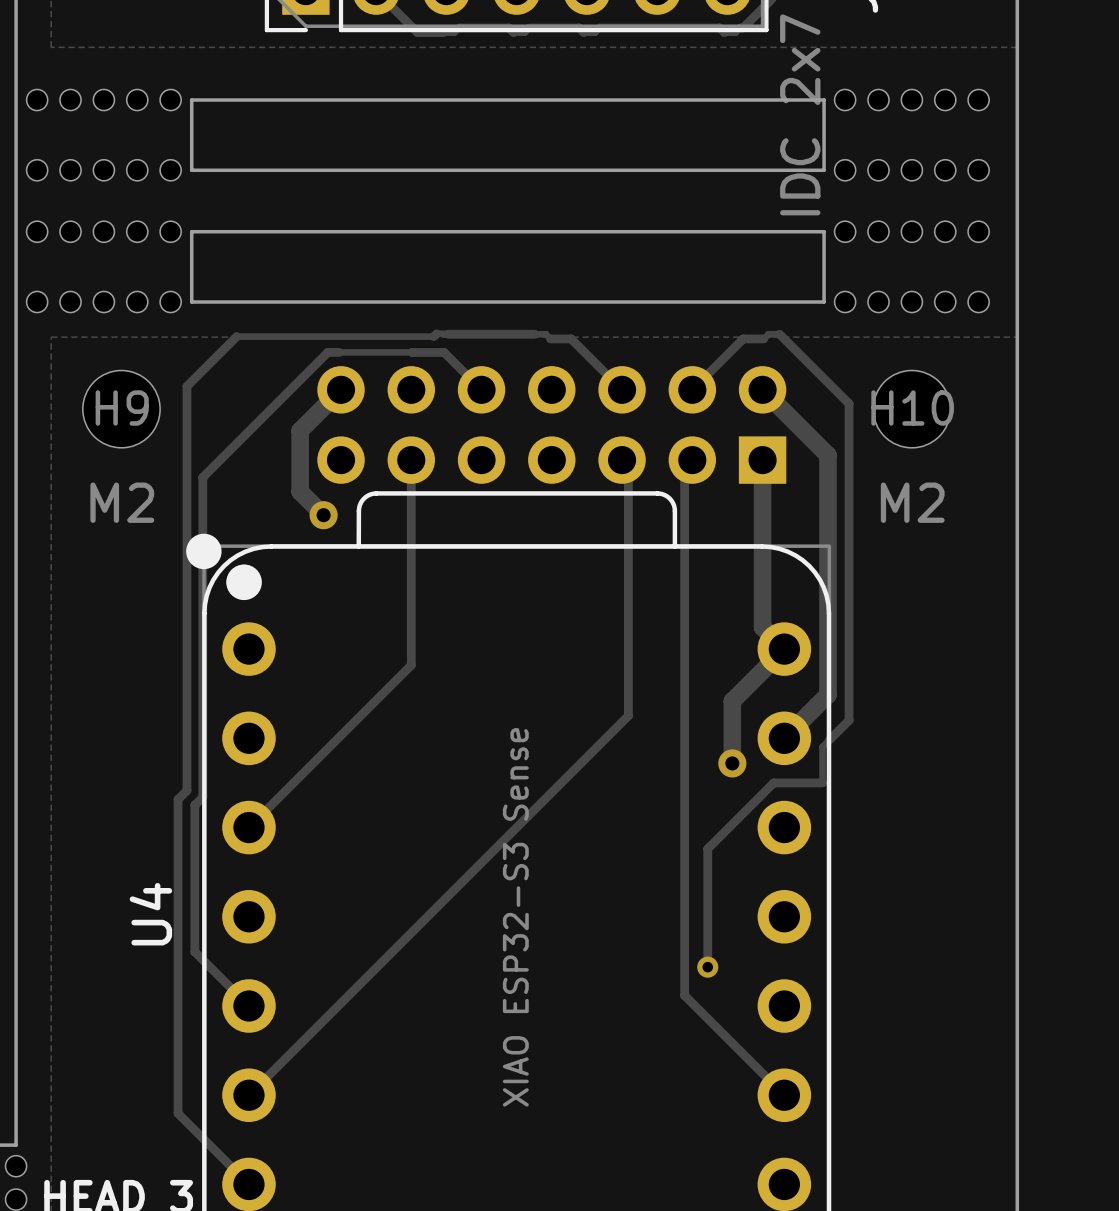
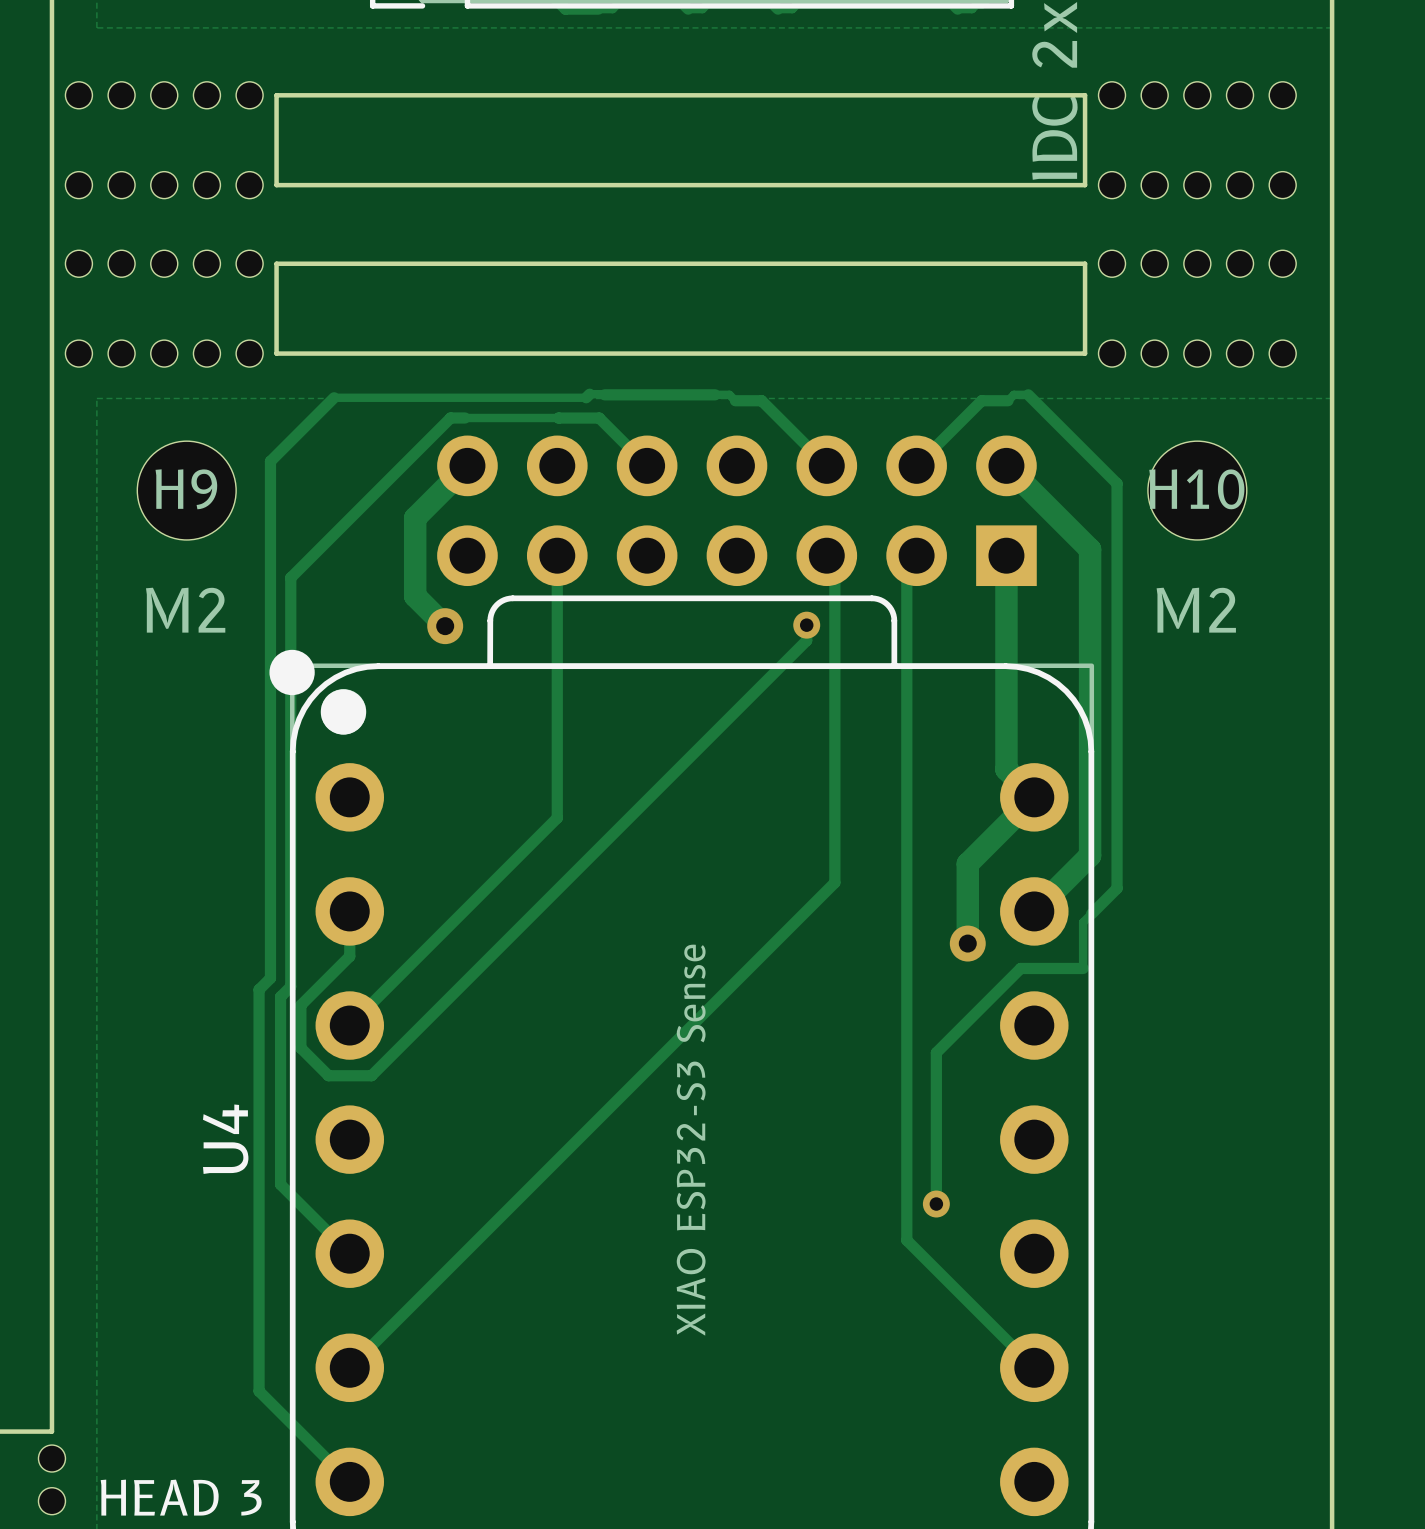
track: none -> (806, 625) (806, 640) (371, 1075) (328, 1075) (300, 1048) (300, 1005) (349, 956) (349, 911)
via: none -> (806, 625)

